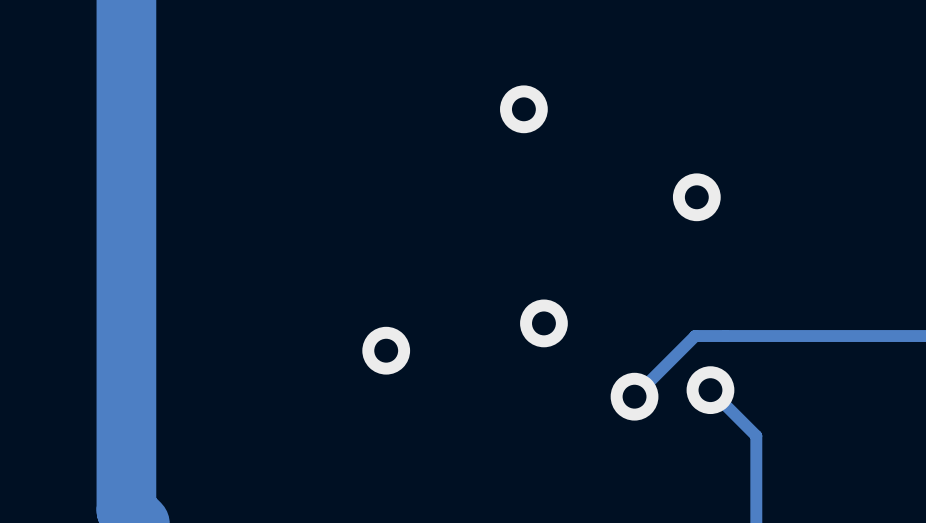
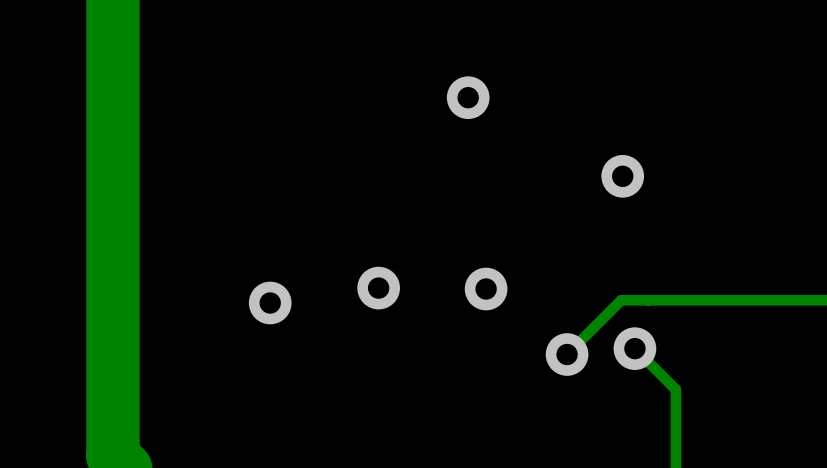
via: none -> (270, 302)
via position: (386, 350) -> (378, 288)

